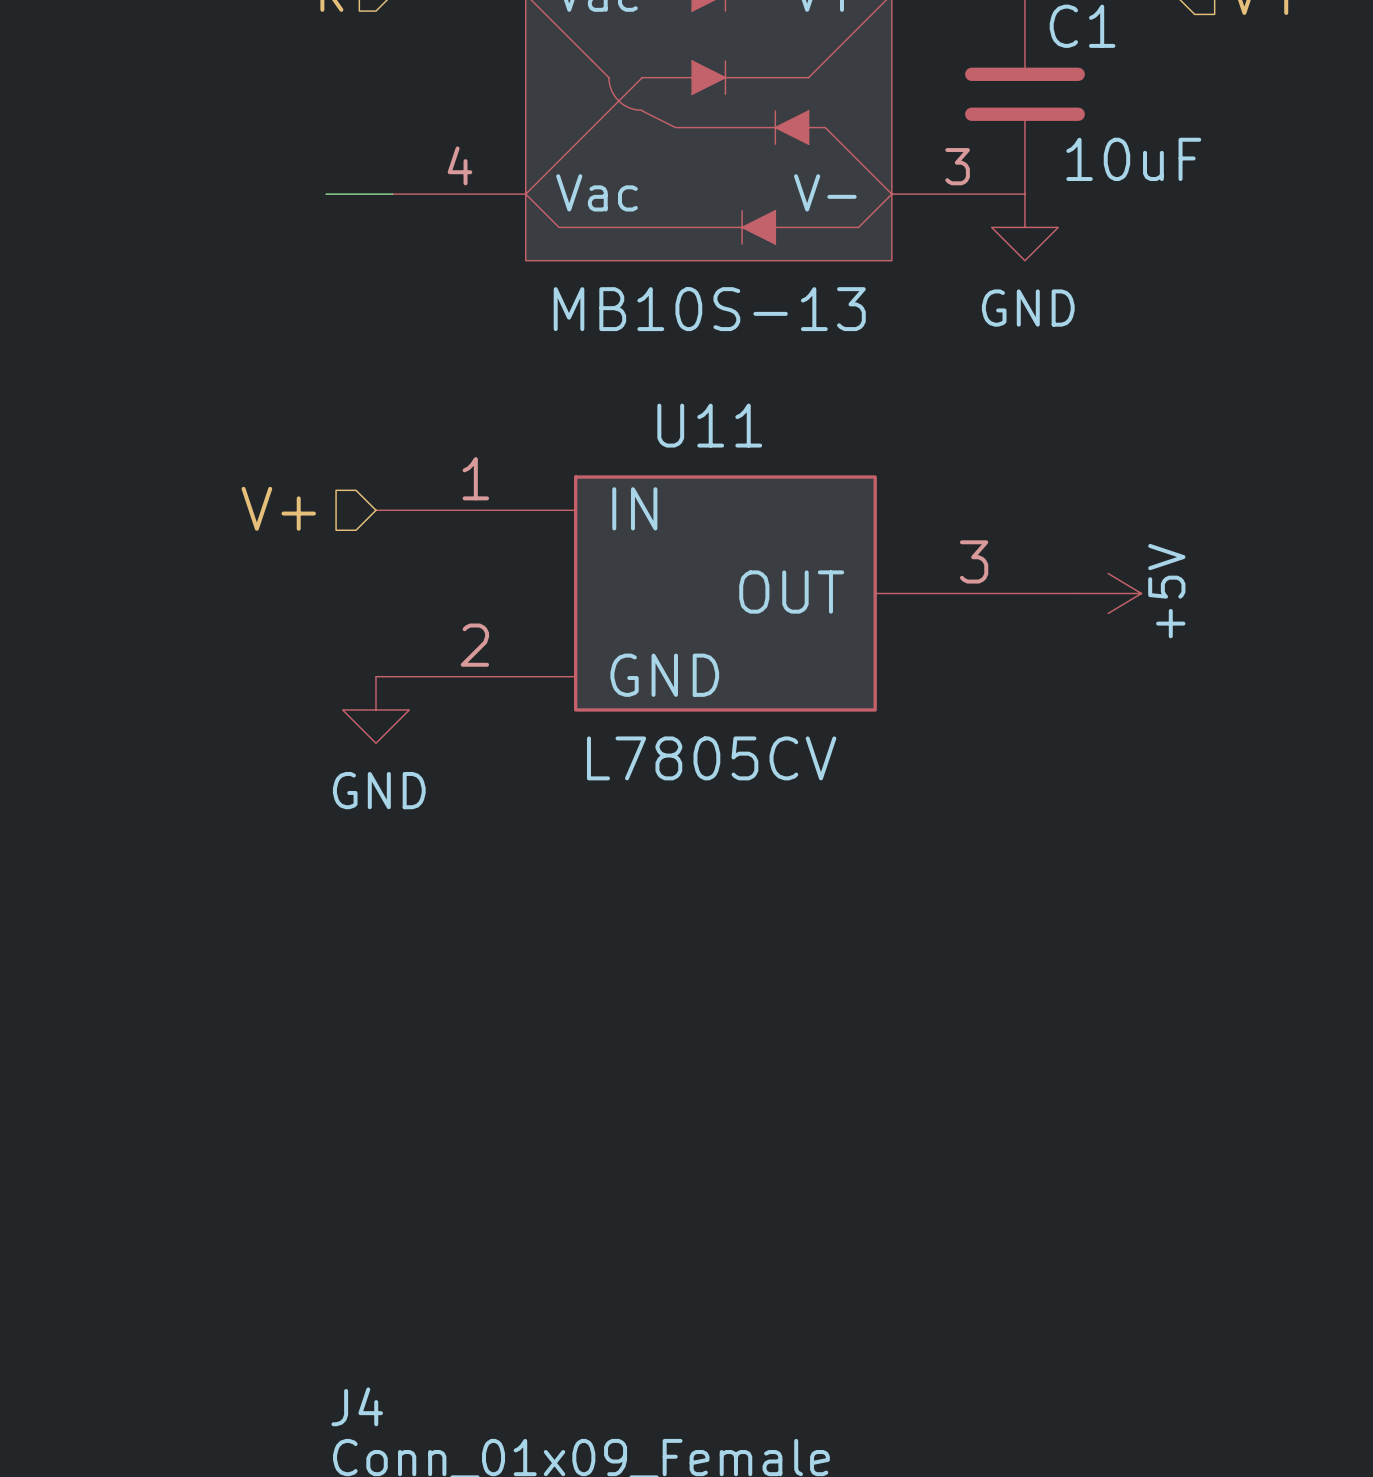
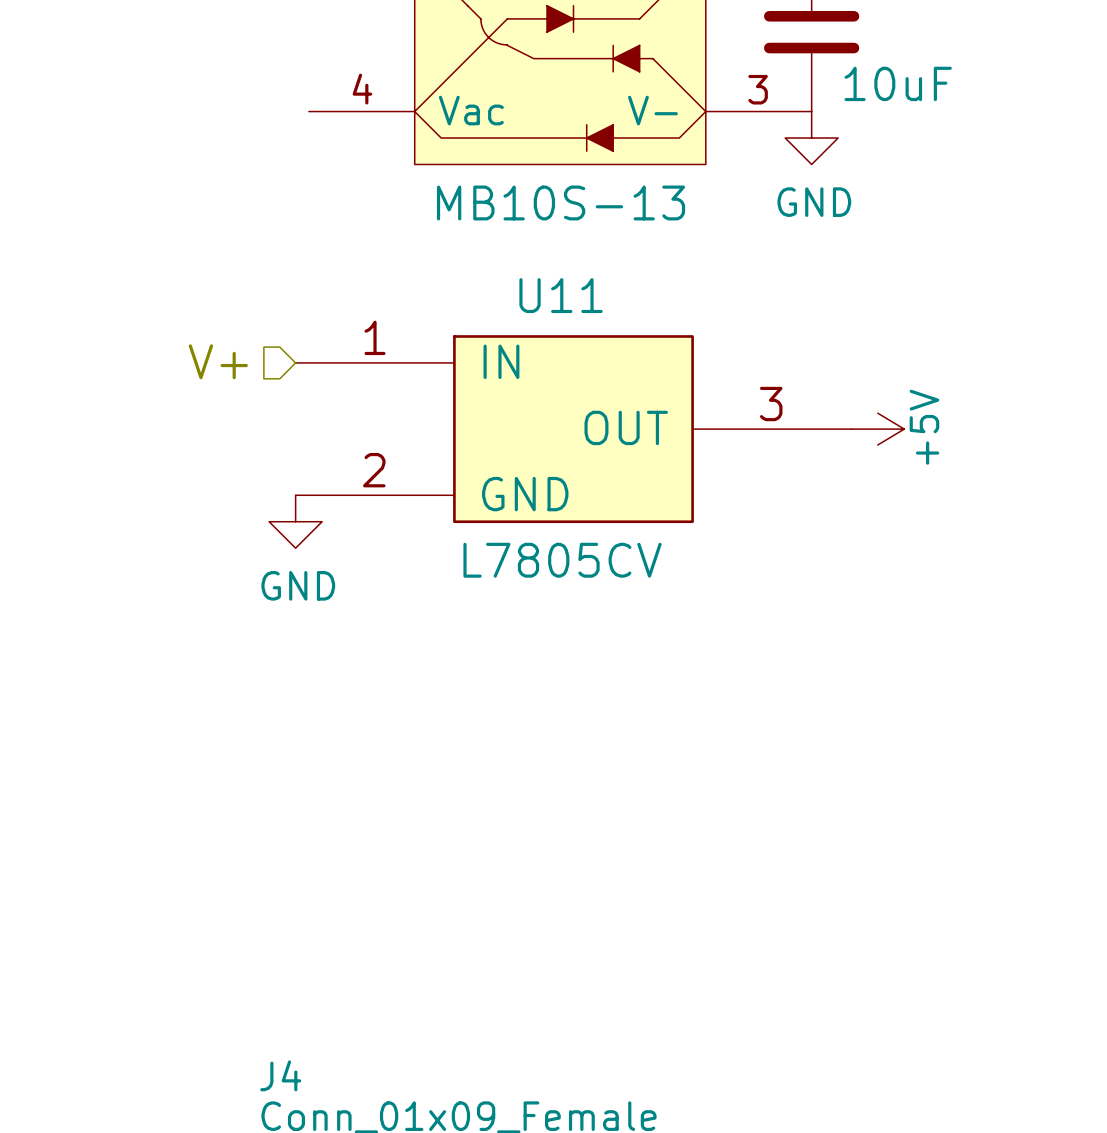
wire: (326, 194) (392, 194) -> none

